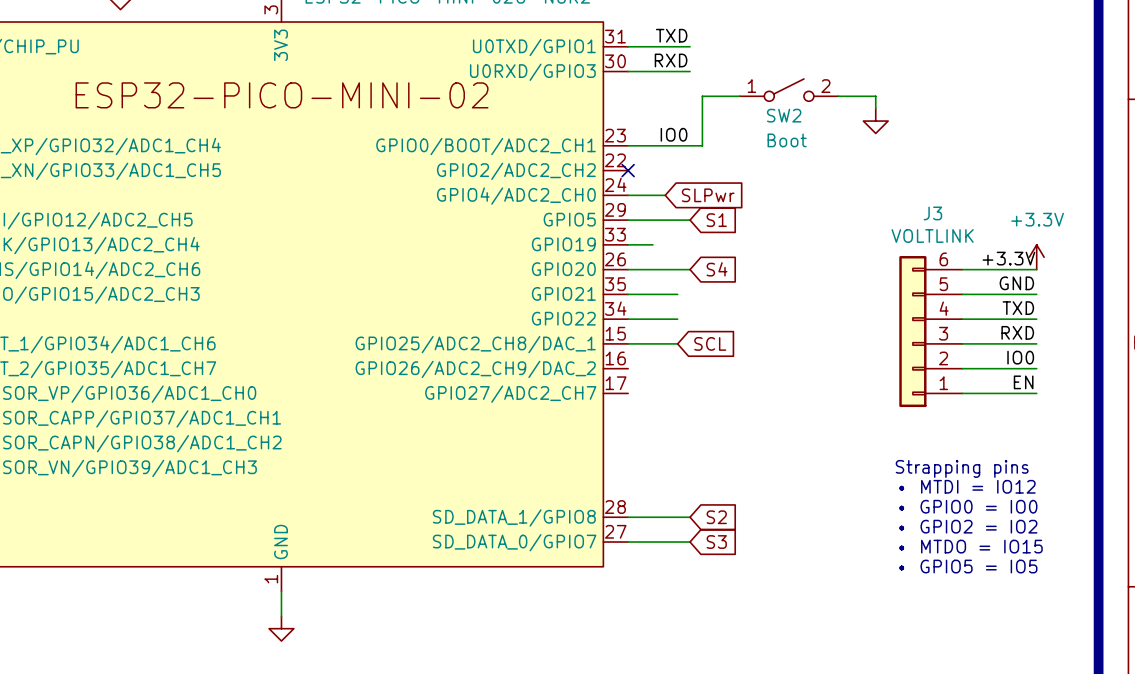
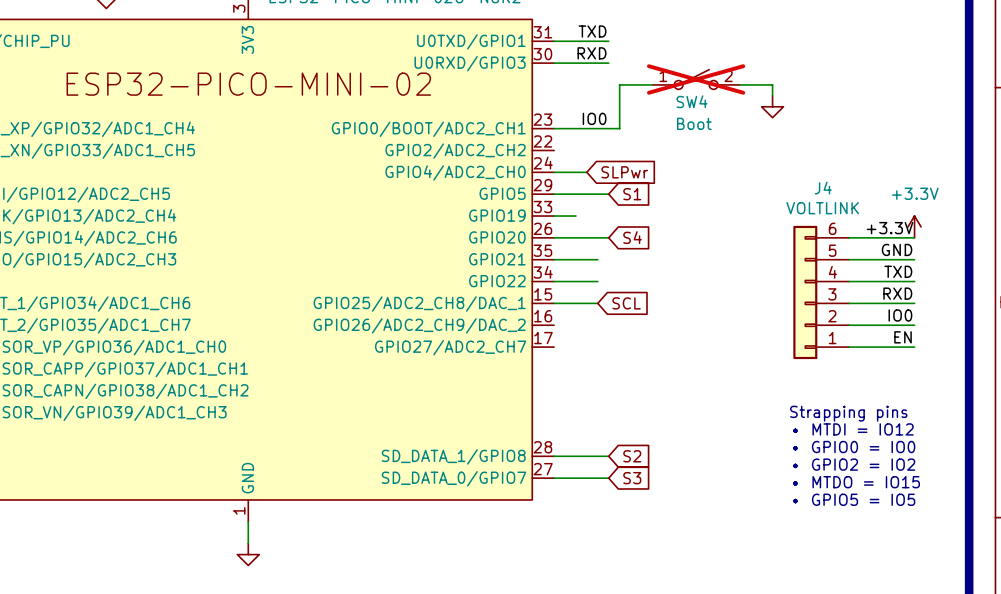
SW2 do-not-place cross: none -> (696, 79)
SW2 name: SW2 (784, 115) -> SW4 (692, 101)
no-connect mark: (628, 170) -> none
J3 name: J3 (932, 213) -> J4 (823, 188)

